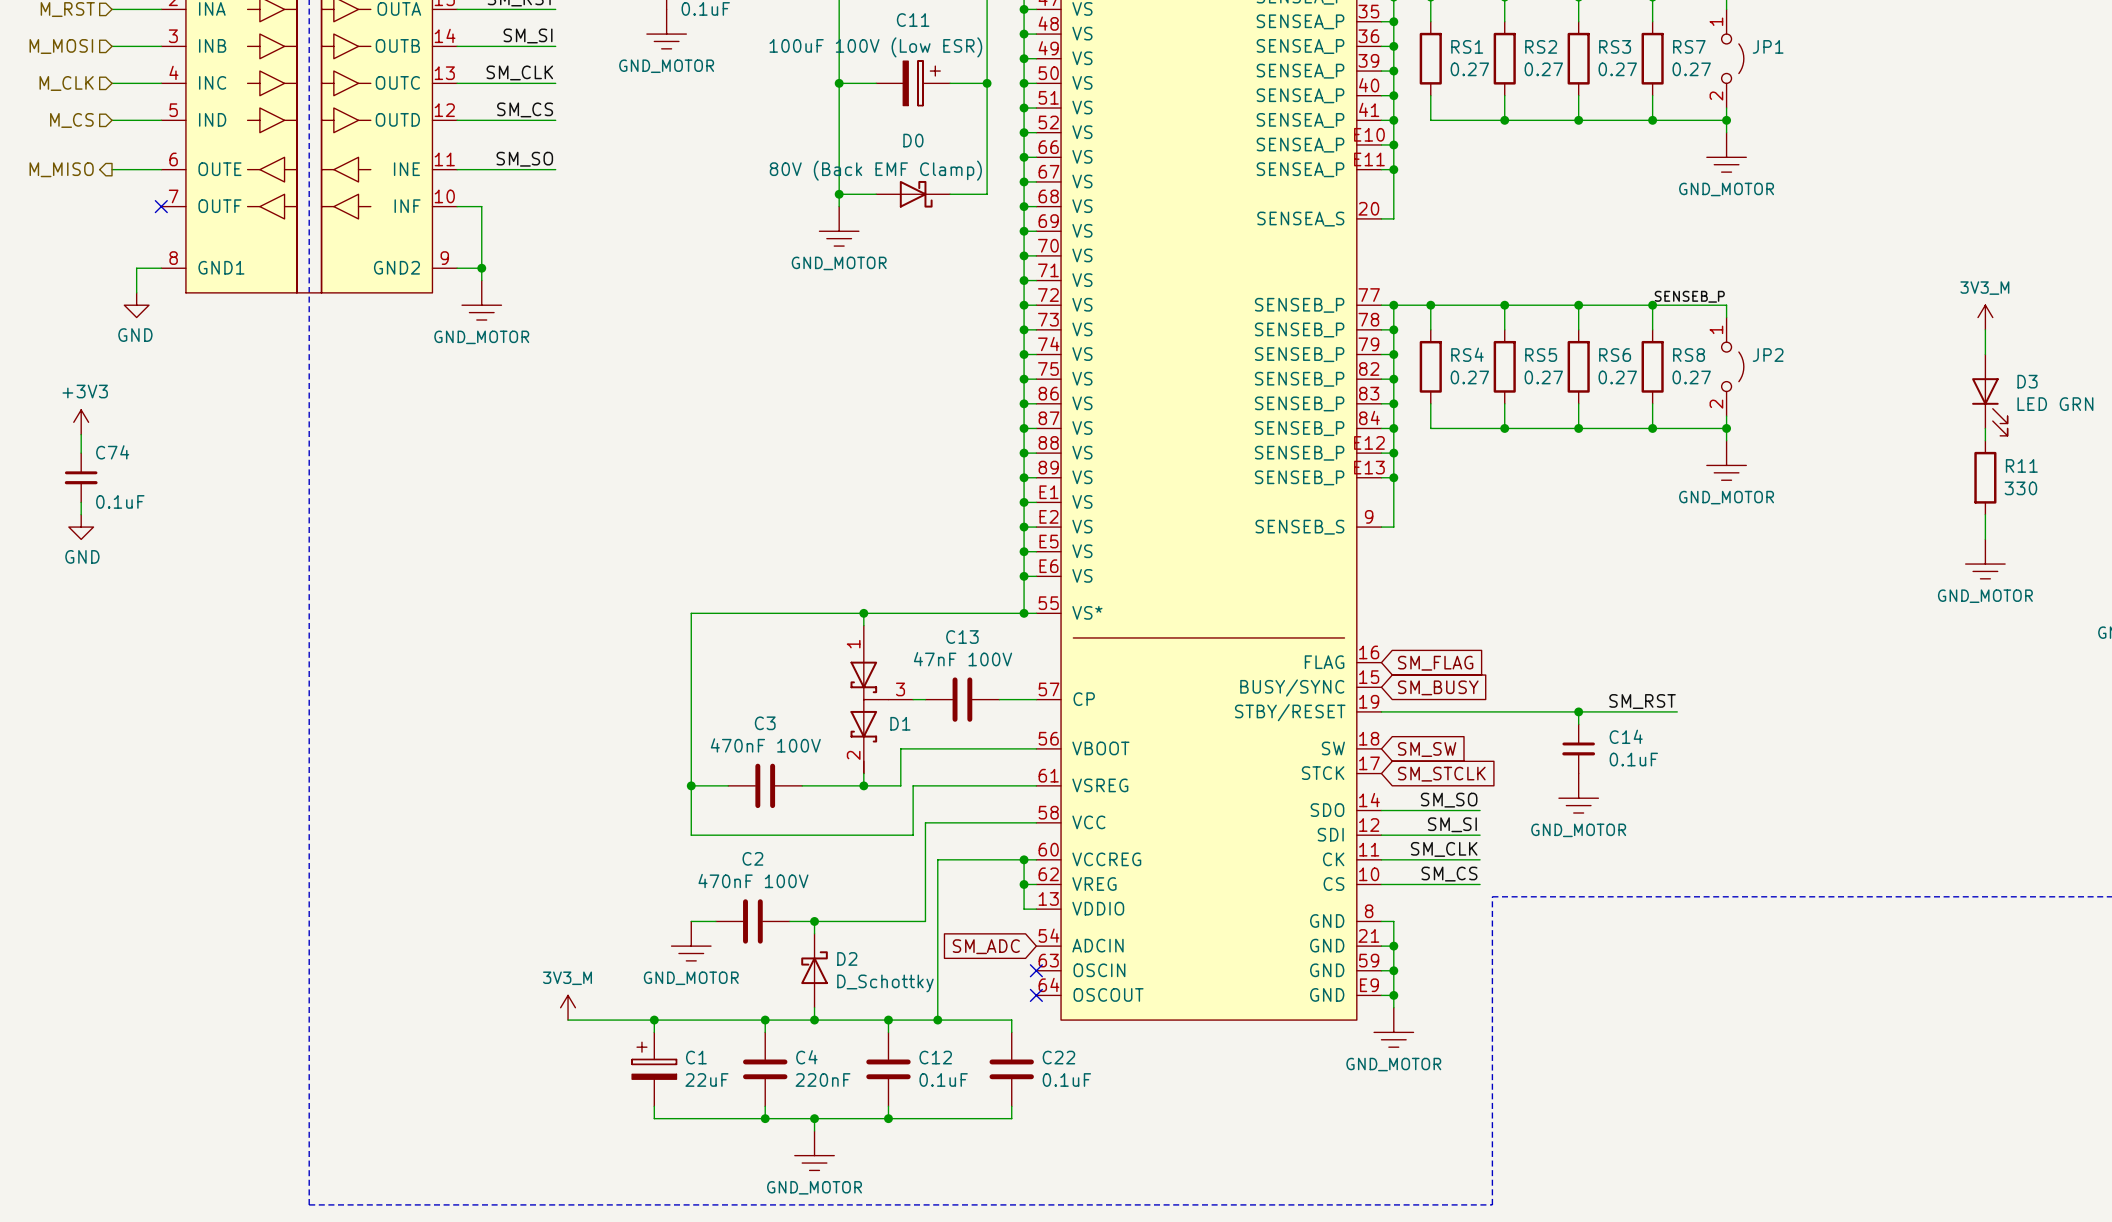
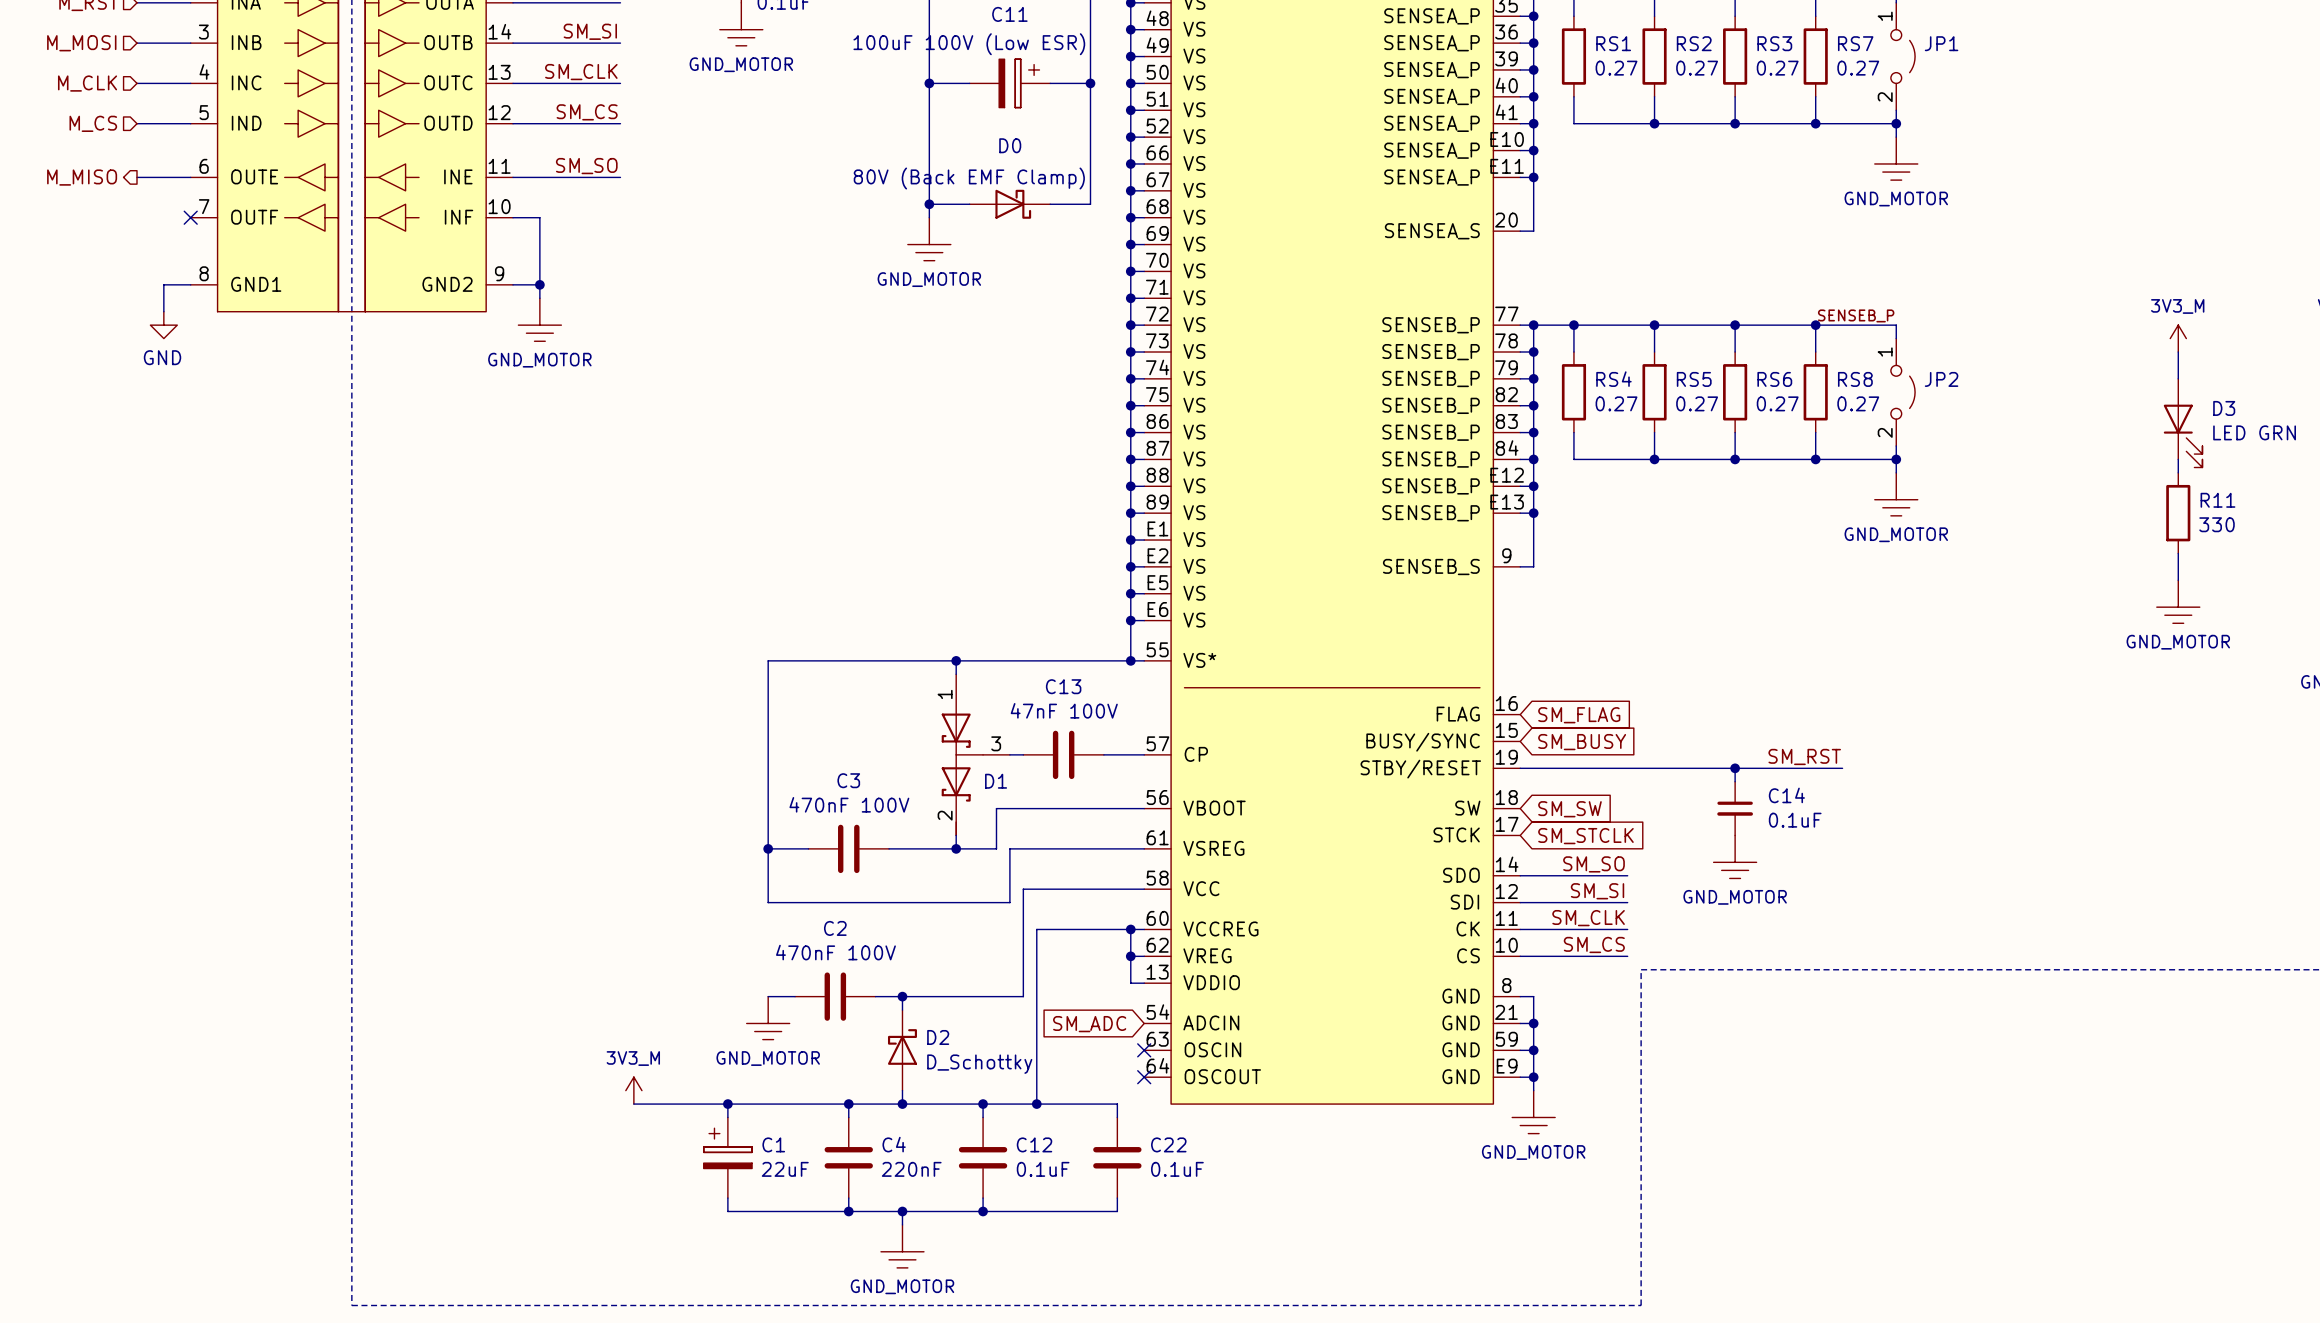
power symbol: +3V3 (81, 422) -> none
wire: (81, 434) (81, 453) -> none
C74: 0.1uF (81, 477) -> none
wire: (81, 502) (81, 514) -> none
power symbol: GND (81, 527) -> none

